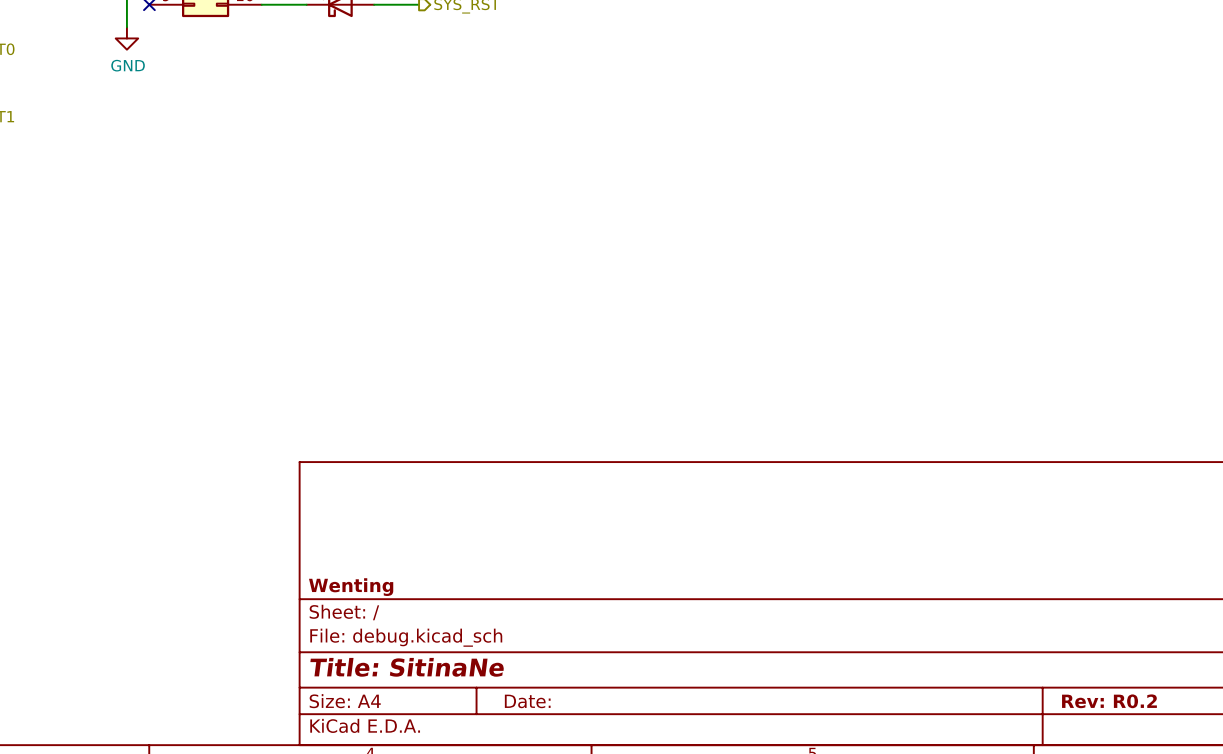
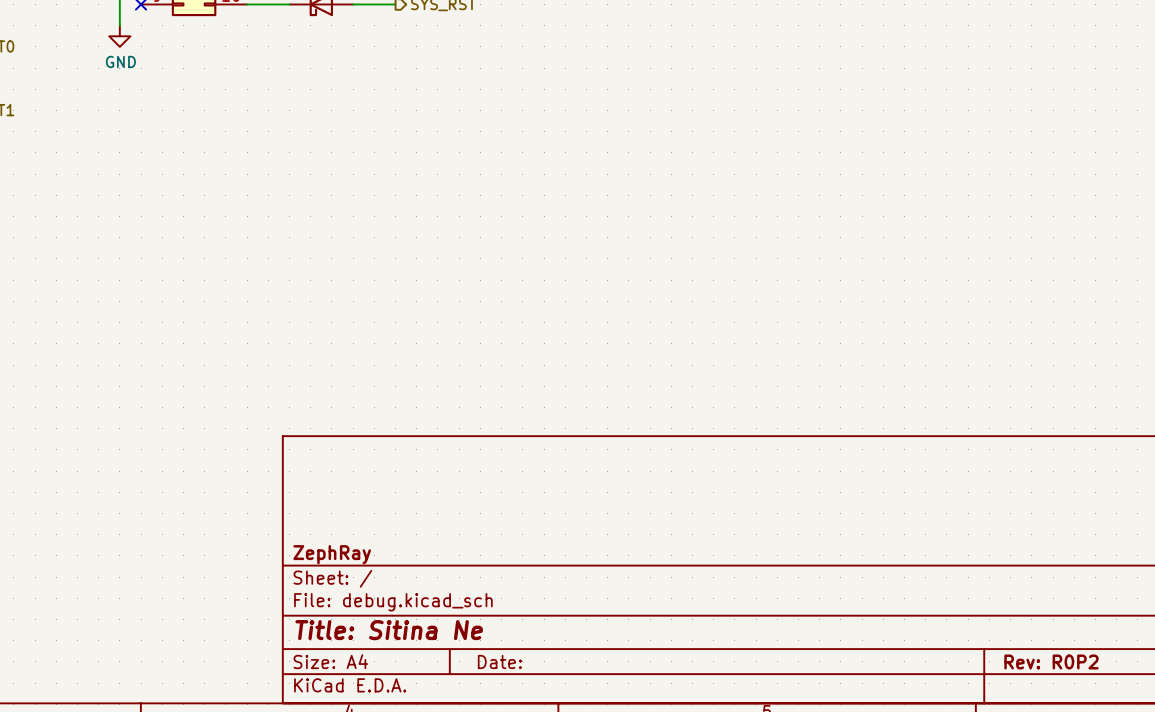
title block: Wenting (351, 587) -> ZephRay (332, 554)
title block: Title: SitinaNe (407, 667) -> Title: Sitina Ne (389, 630)
title block: Rev: R0.2 (1109, 701) -> Rev: R0P2 (1051, 661)

